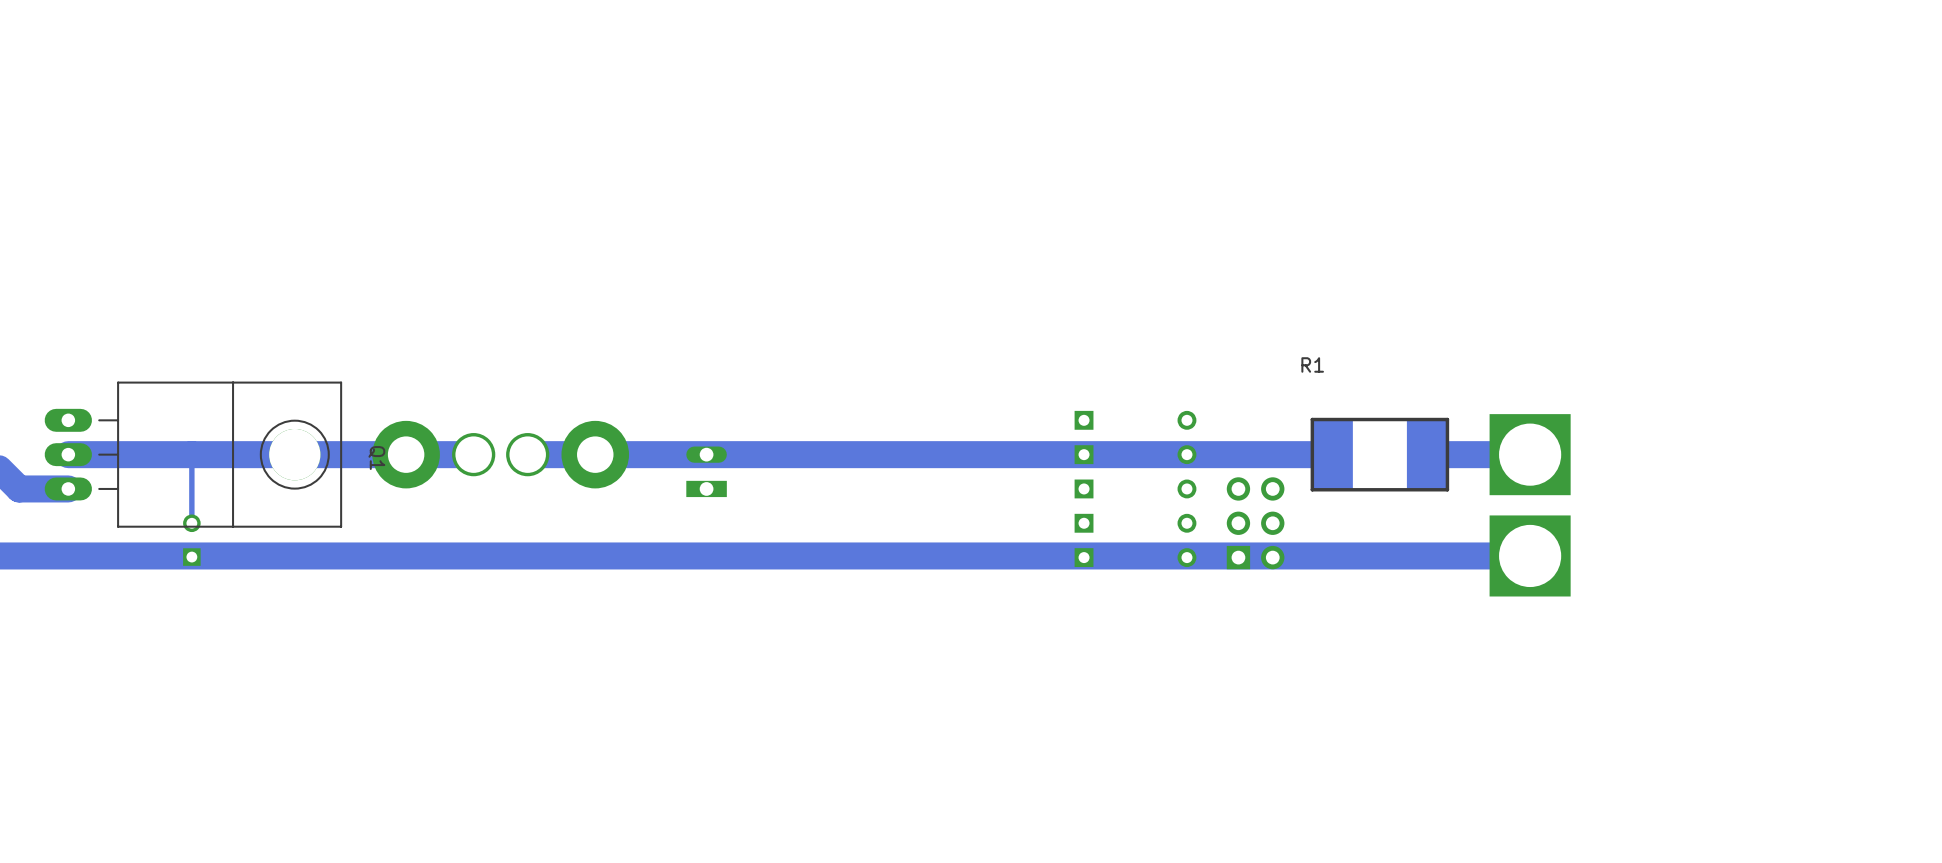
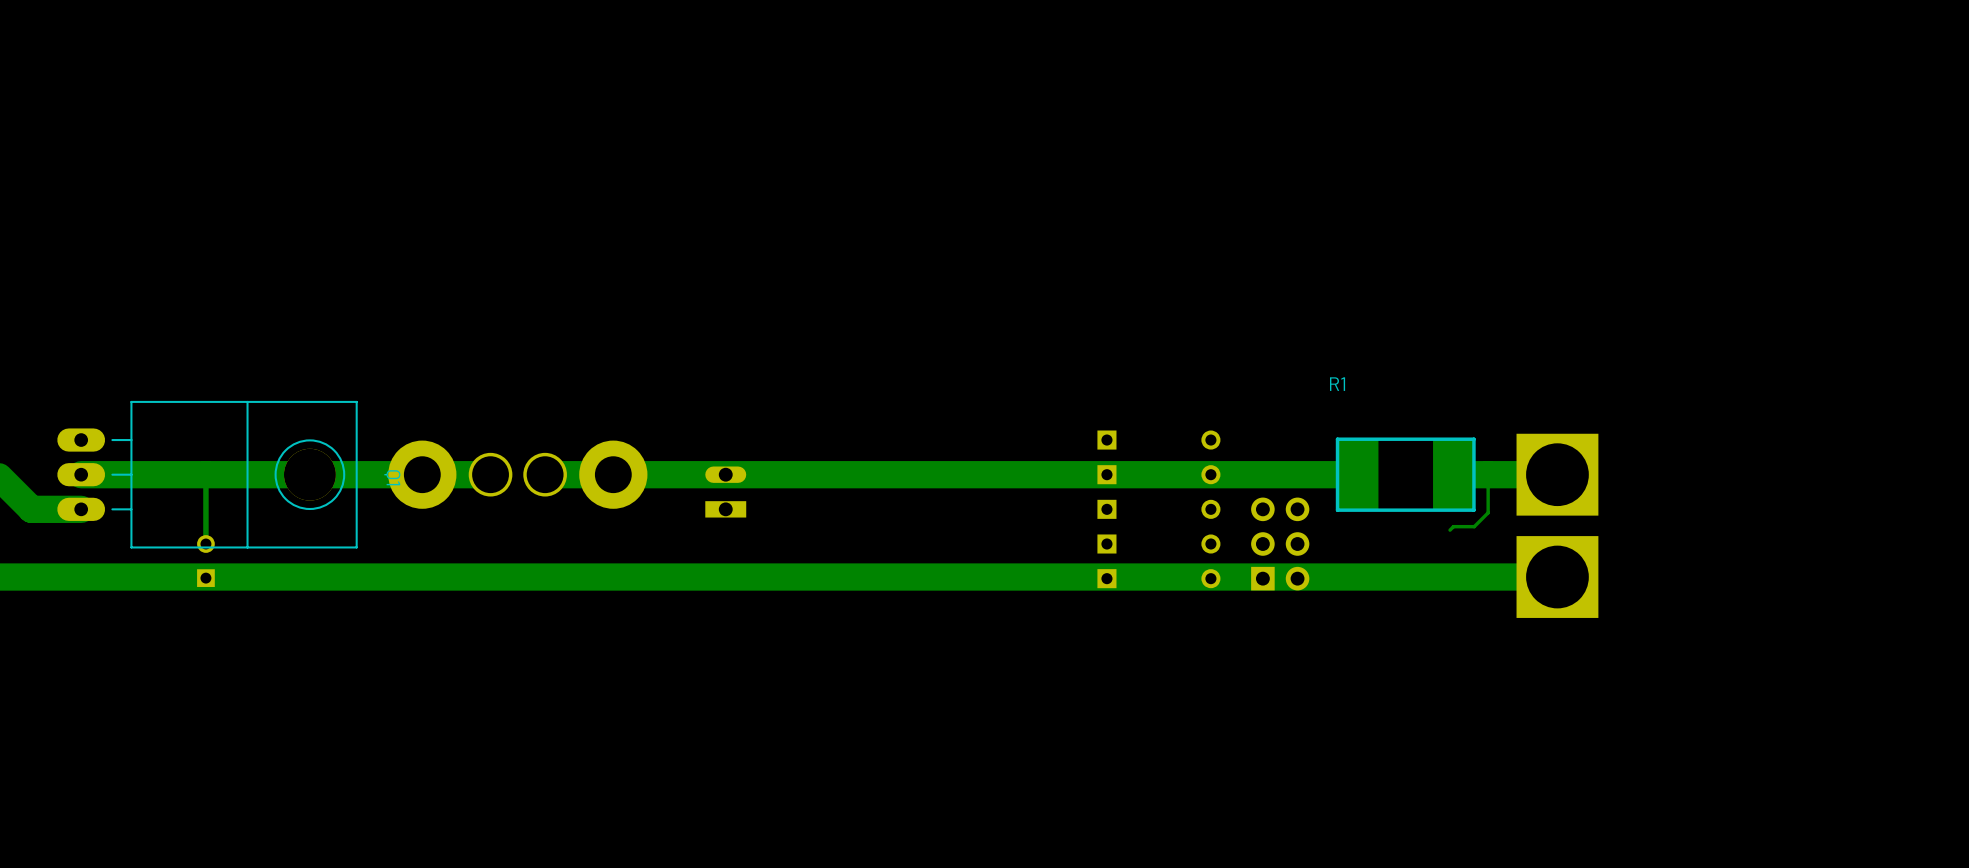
track: none -> (1488, 474) (1488, 512) (1474, 526) (1453, 526) (1450, 530)

